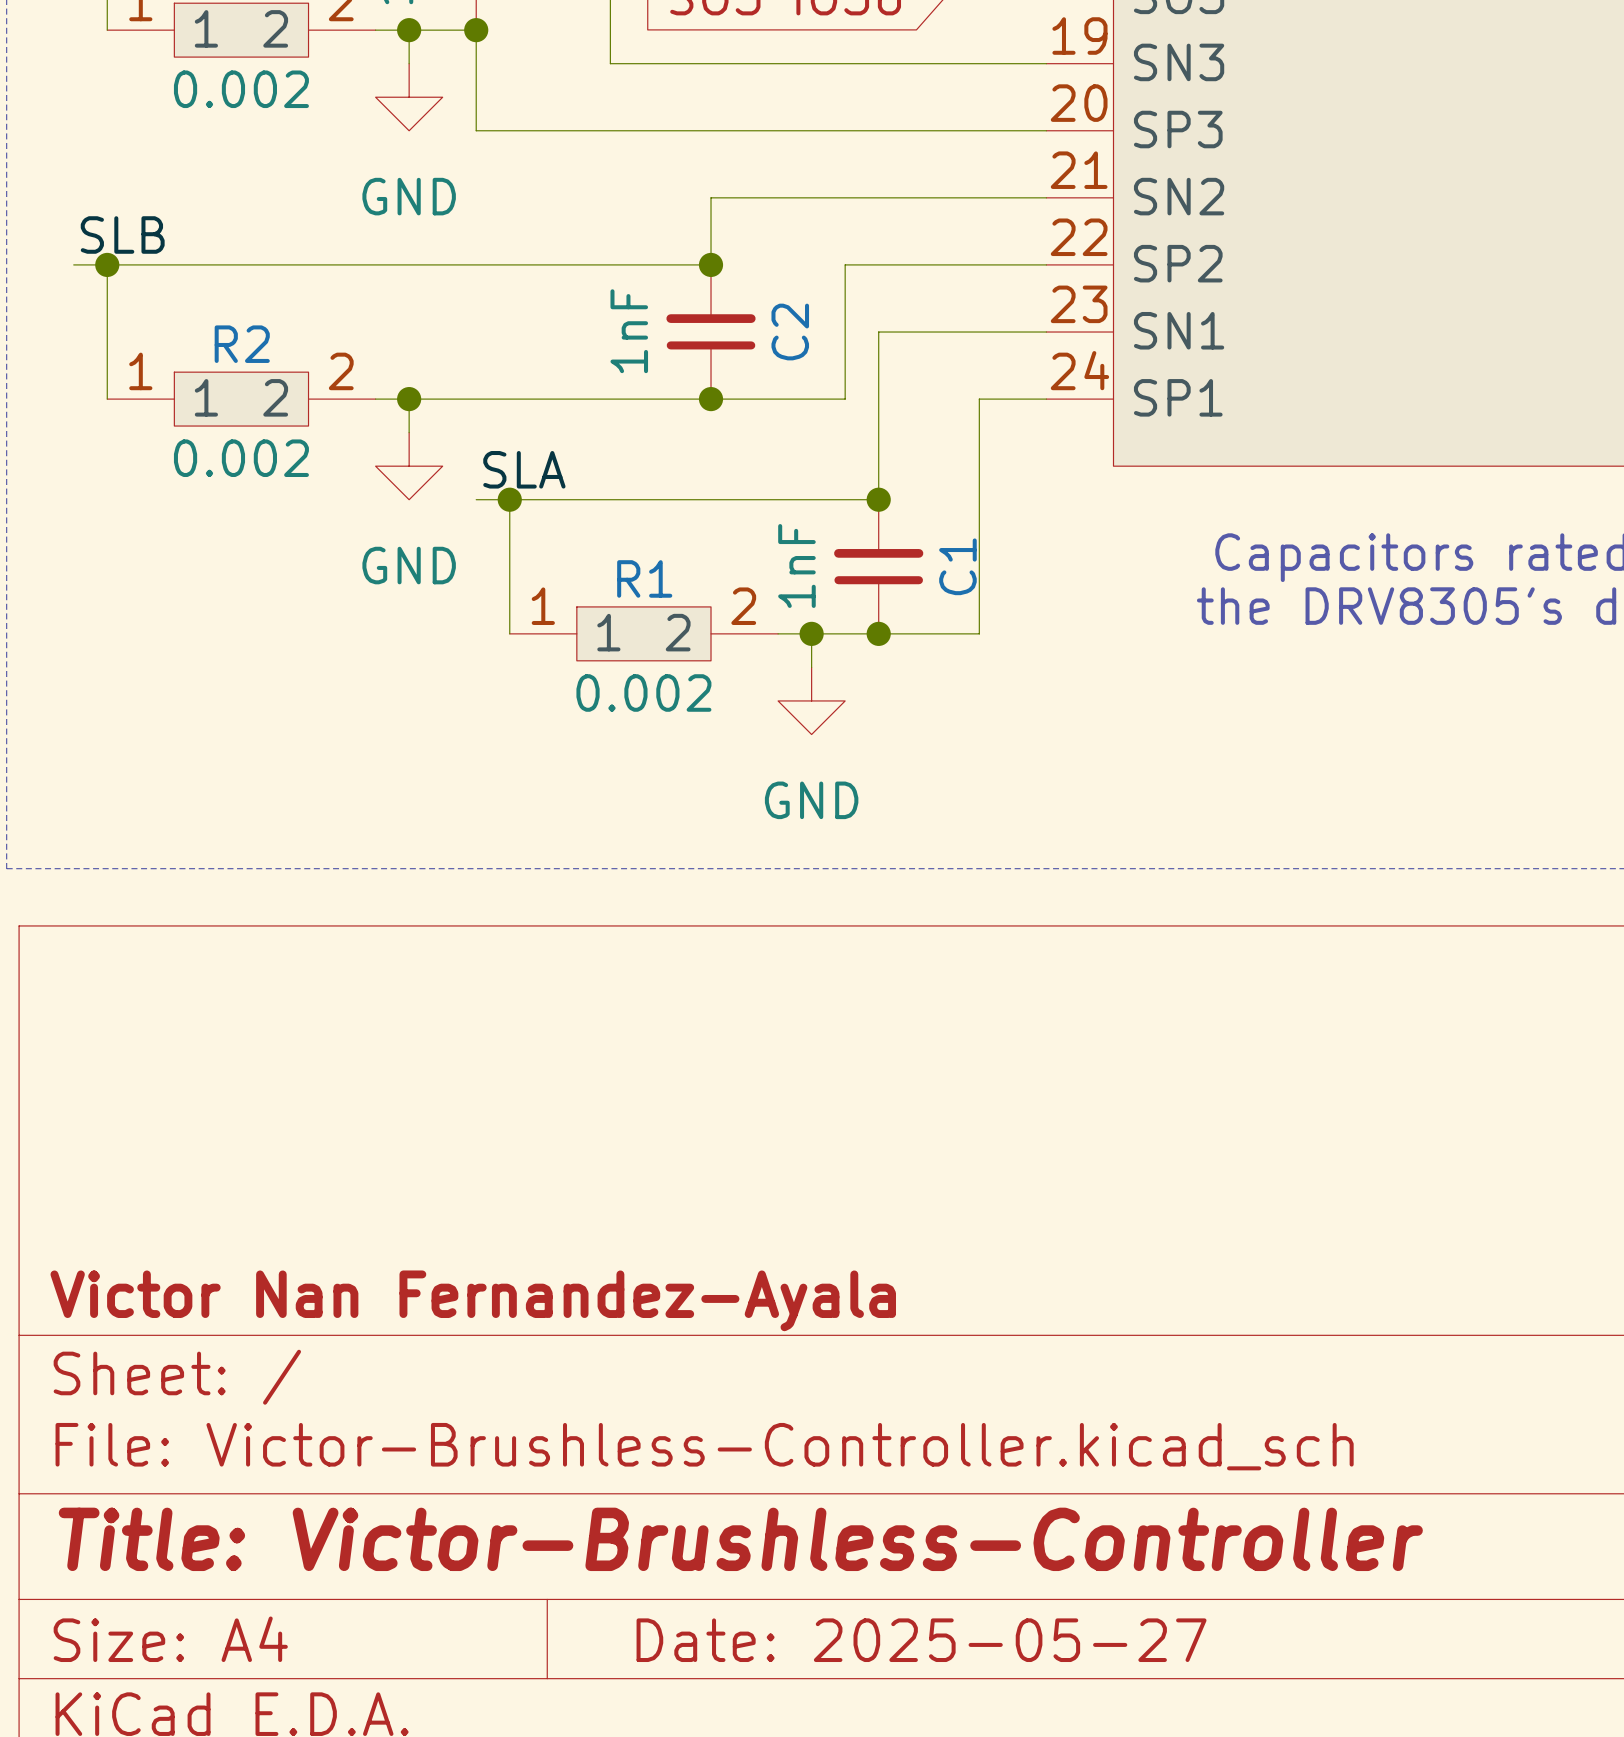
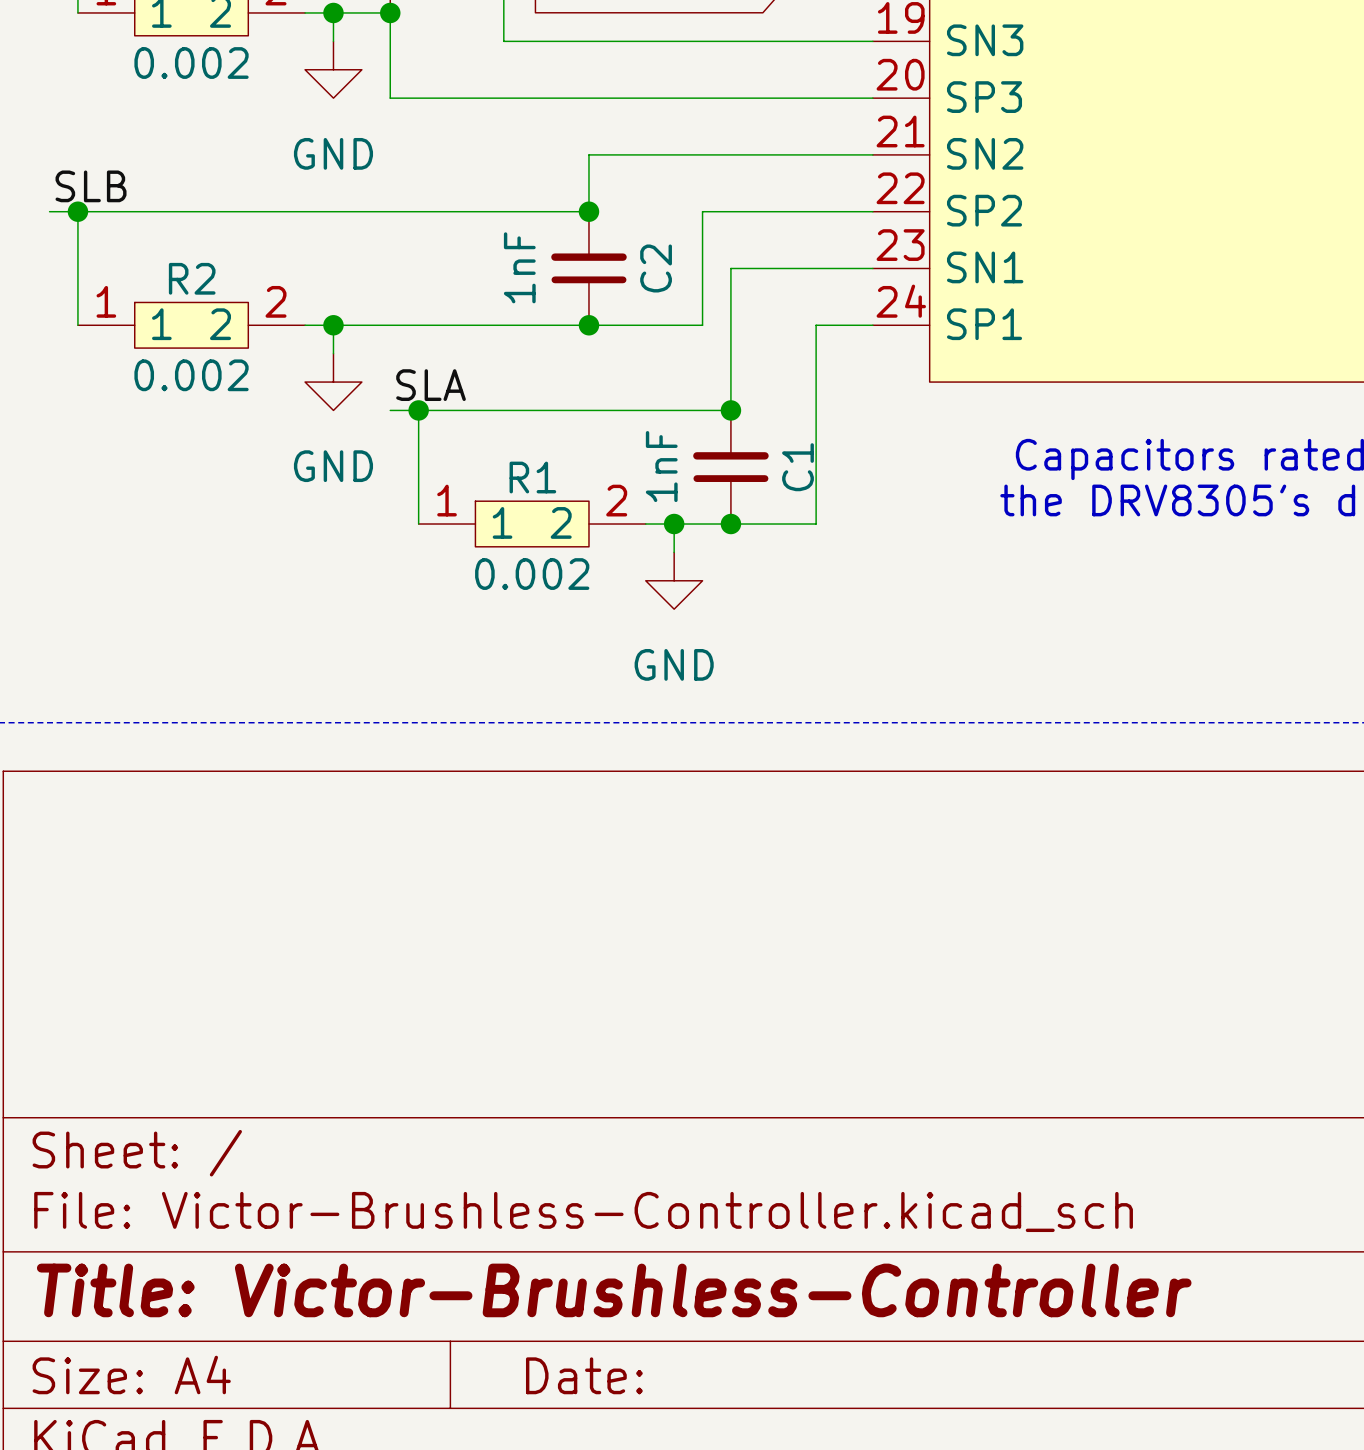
title block: Victor Nan Fernandez-Ayala (473, 1300) -> none
title block: Date: 2025-05-27 (921, 1640) -> Date: (584, 1375)

